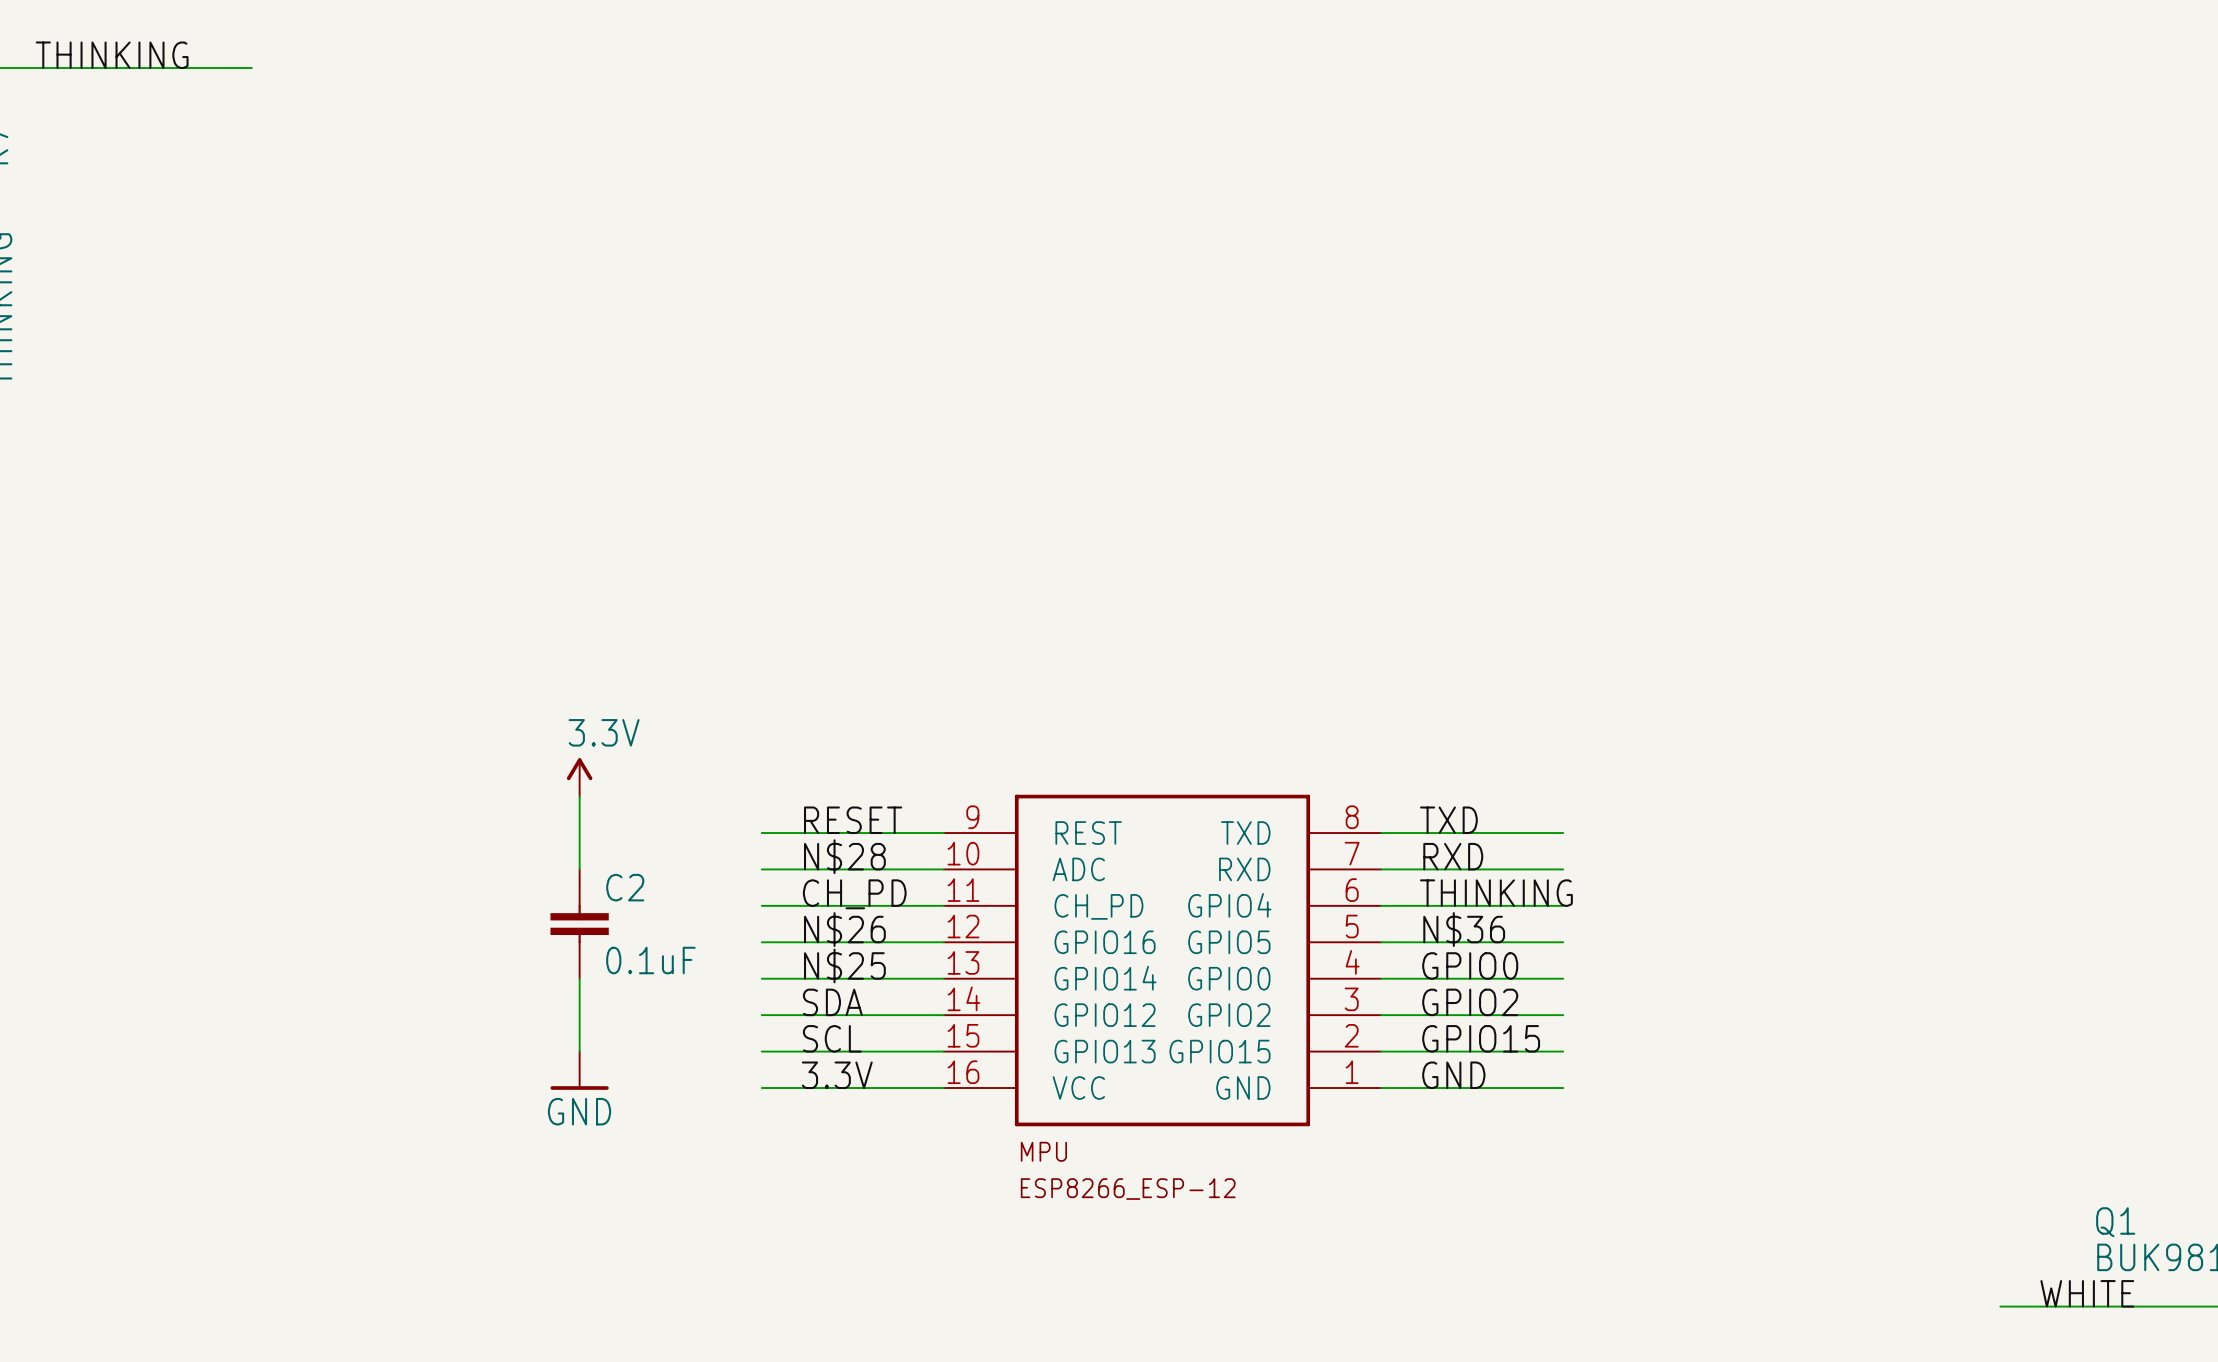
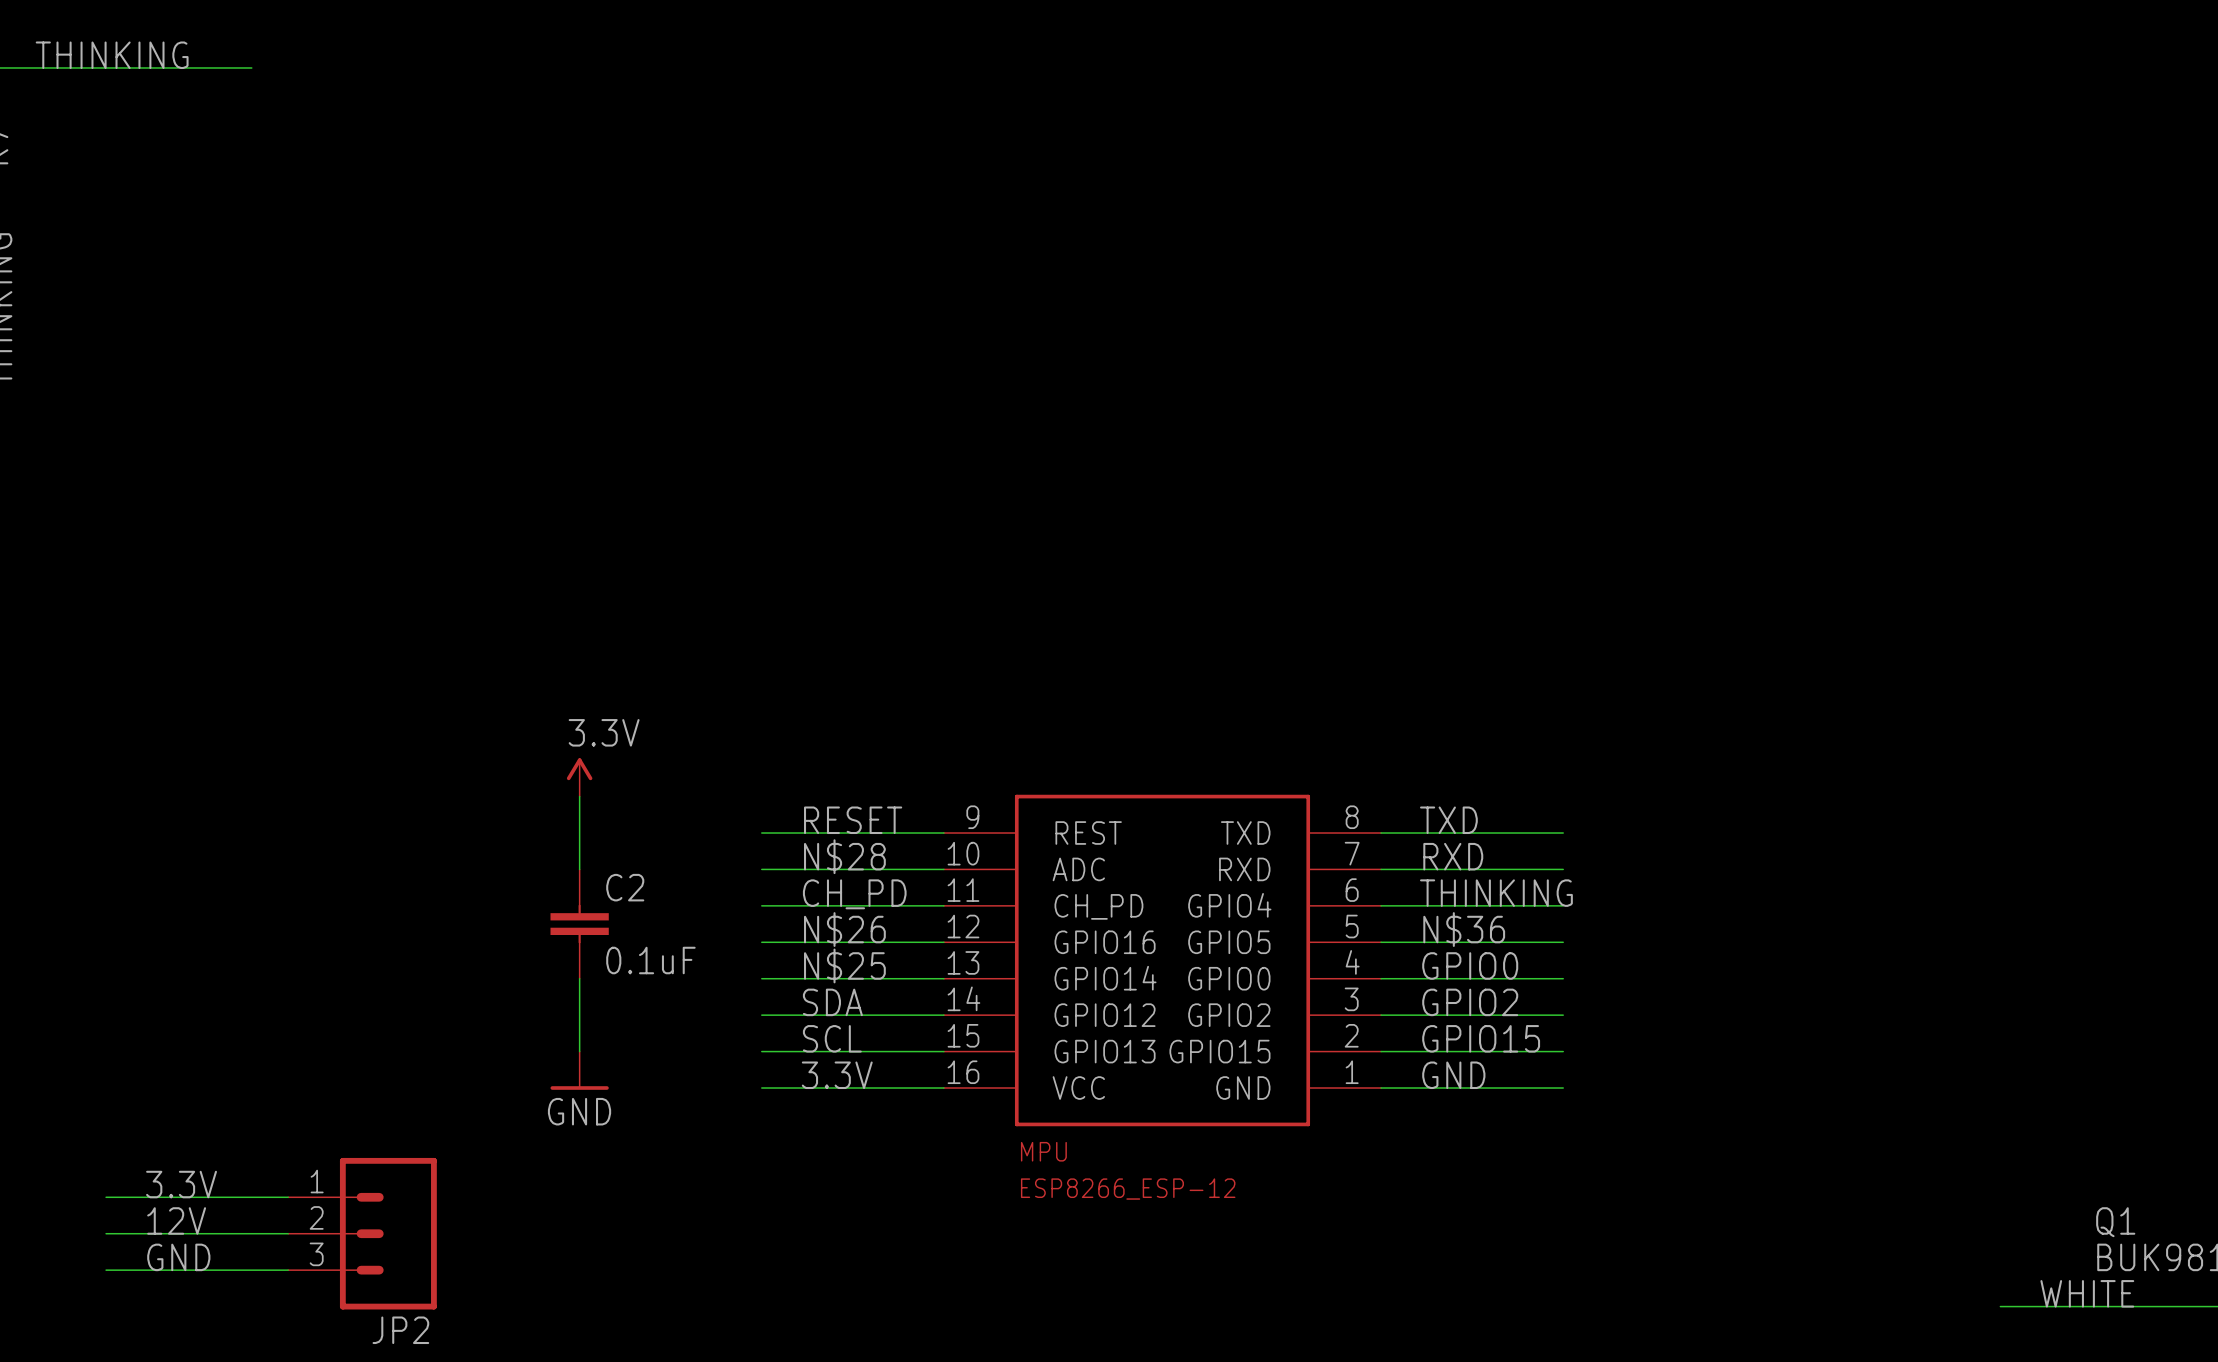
label: none -> 3.3V (181, 1184)
wire: none -> (106, 1197) (288, 1197)
label: none -> 12V (176, 1220)
wire: none -> (106, 1233) (288, 1233)
JP2: none -> (362, 1233)
label: none -> GND (178, 1257)
wire: none -> (106, 1270) (288, 1270)

